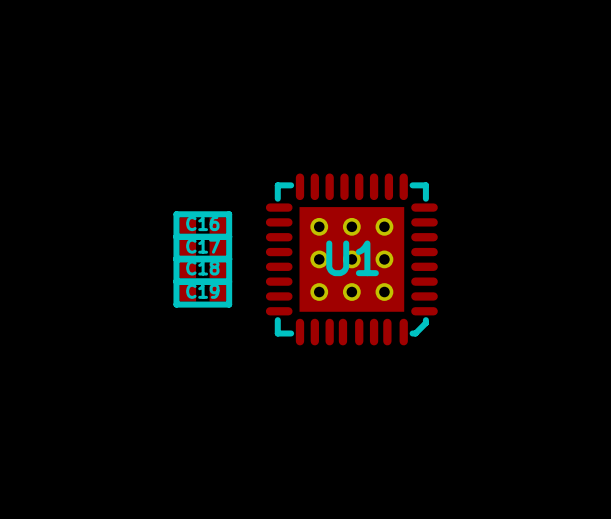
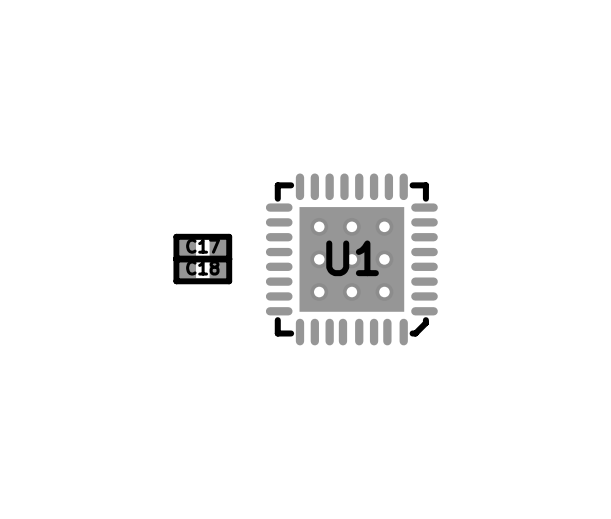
C16: (202, 225) -> none
C19: (202, 293) -> none

